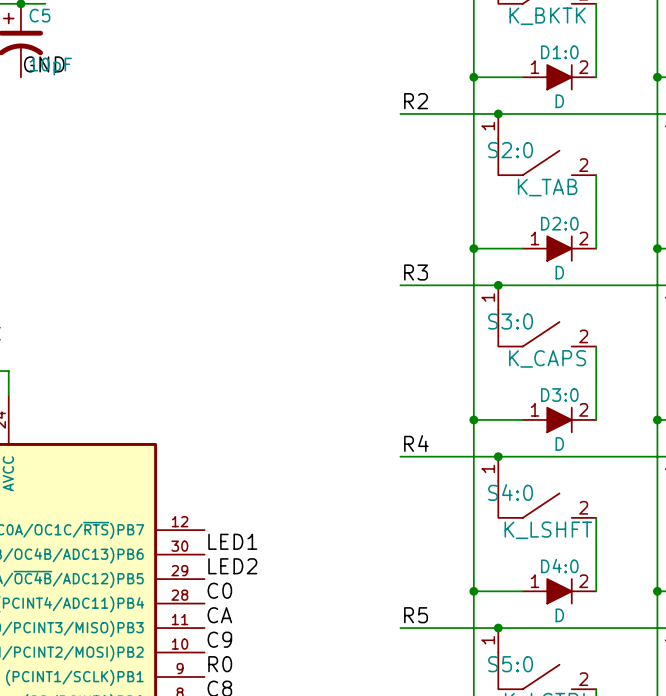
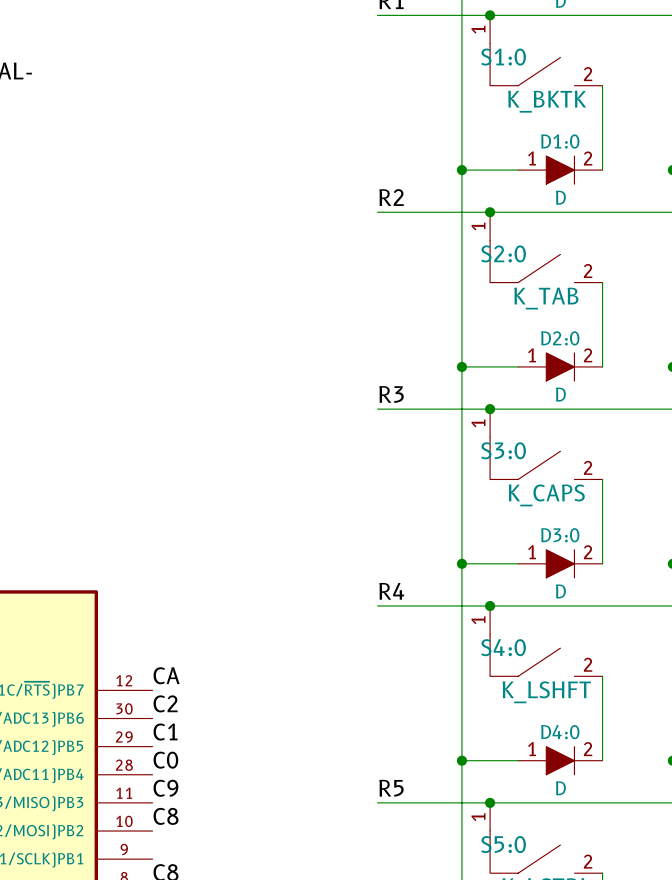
label: none -> CA (166, 675)
label: LED1 (232, 541) -> C2 (165, 703)
label: LED2 (232, 566) -> C1 (165, 732)
label: CA (219, 615) -> C9 (165, 788)
label: C9 (219, 639) -> C8 (166, 816)
label: R0 (220, 664) -> none

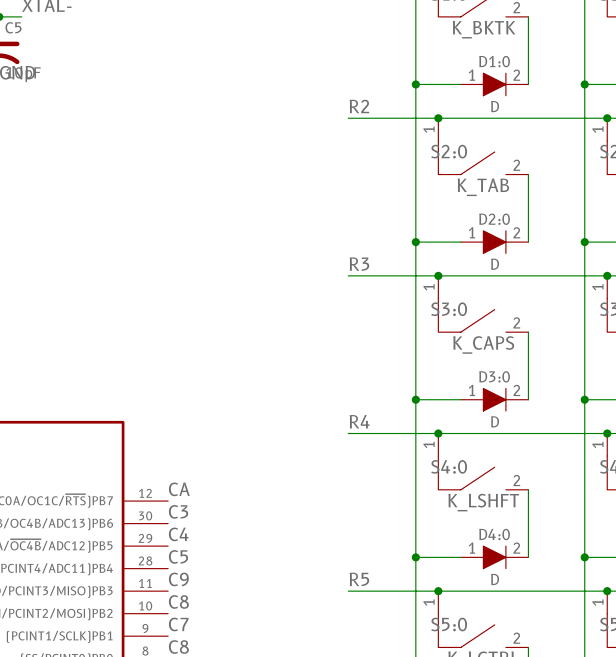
label: C2 (165, 703) -> C3 (178, 511)
label: C1 (165, 732) -> C4 (178, 534)
label: C0 (165, 760) -> C5 (178, 556)
label: none -> C7 (178, 624)

